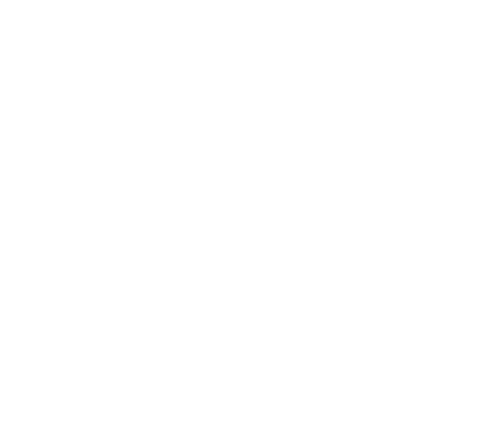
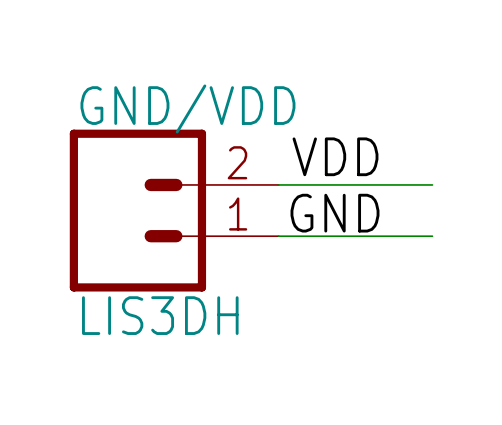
label: none -> VDD (335, 156)
wire: none -> (278, 184) (432, 184)
GND/VDD: none -> LIS3DH (174, 210)
label: none -> GND (334, 213)
wire: none -> (278, 236) (432, 236)

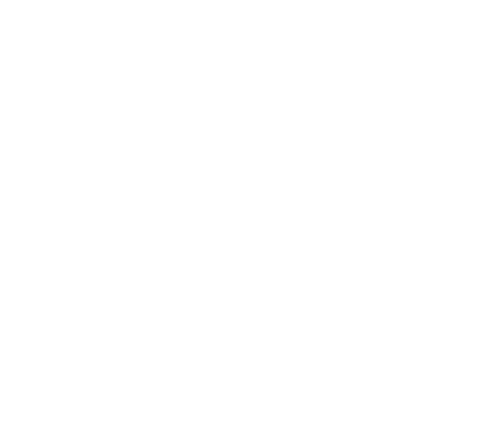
label: VDD (335, 156) -> none
wire: (278, 184) (432, 184) -> none
GND/VDD: LIS3DH (174, 210) -> none
label: GND (334, 213) -> none
wire: (278, 236) (432, 236) -> none

